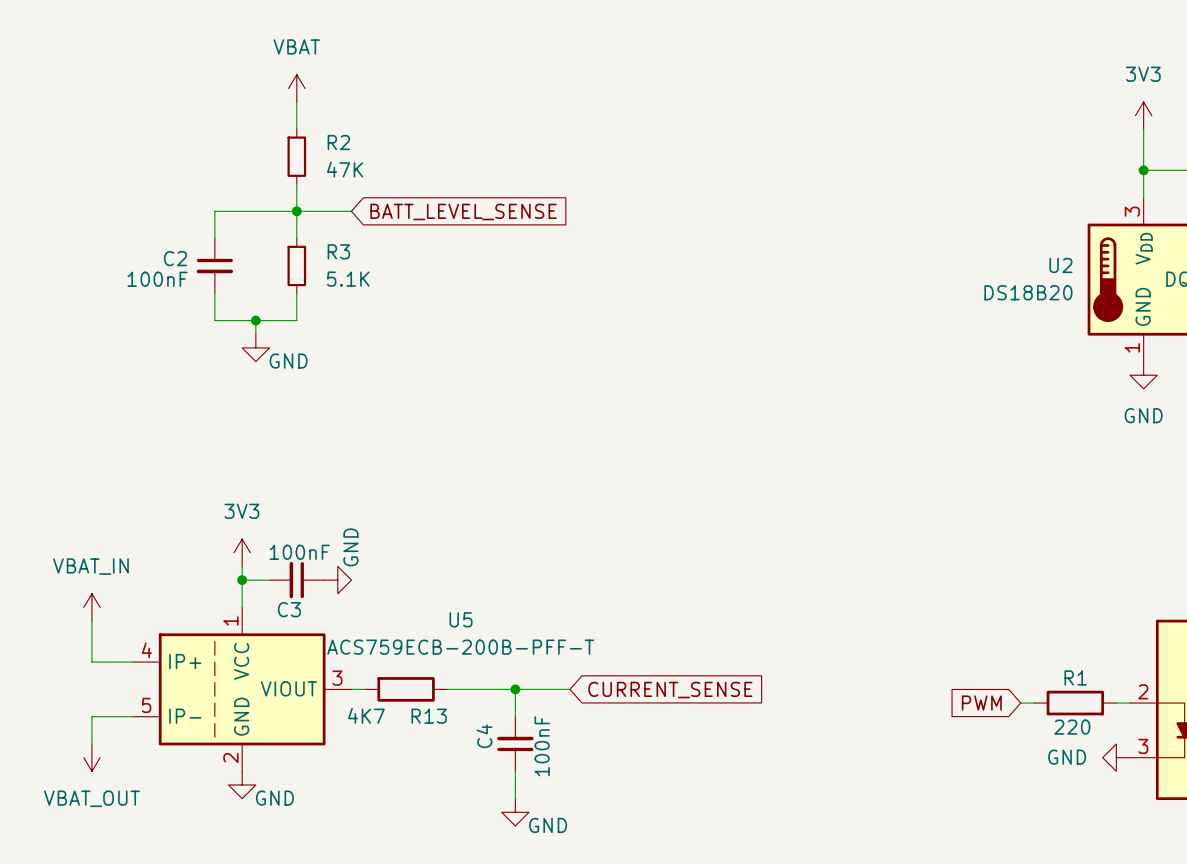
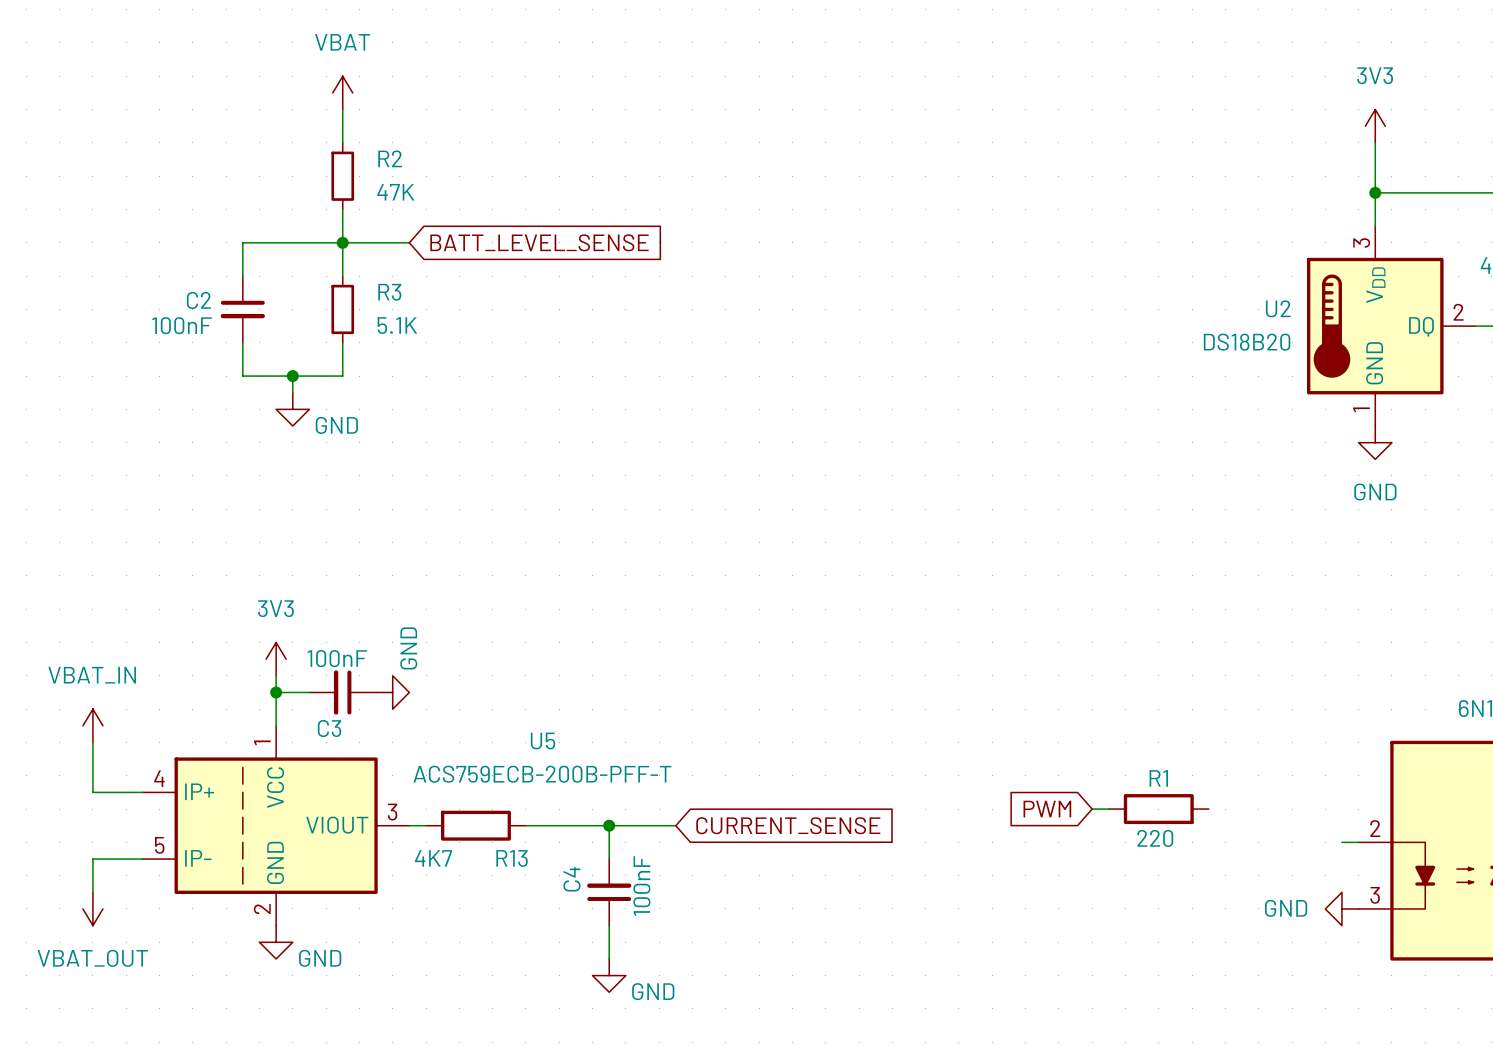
global label position: PWM (981, 703) -> PWM (1047, 809)
wire: (1020, 703) (1034, 703) -> (1092, 809) (1108, 809)
R1 position: (1075, 703) -> (1158, 809)

